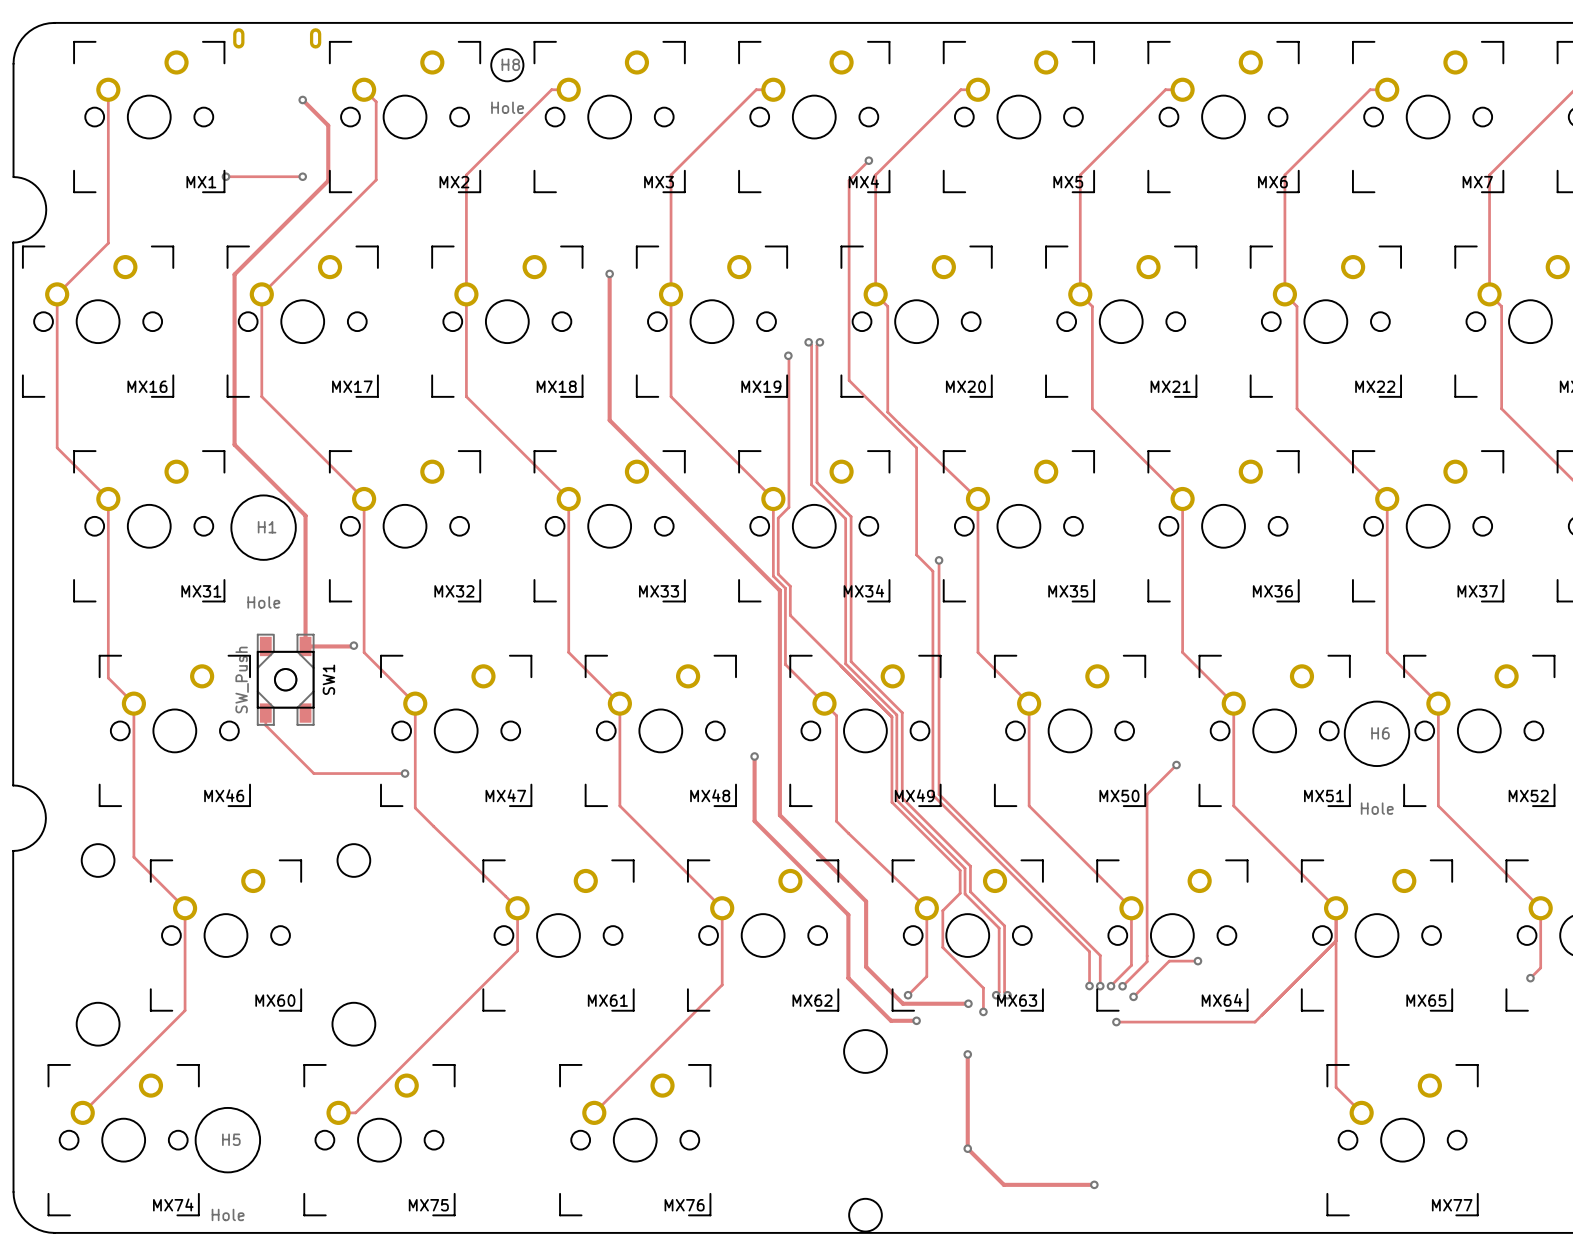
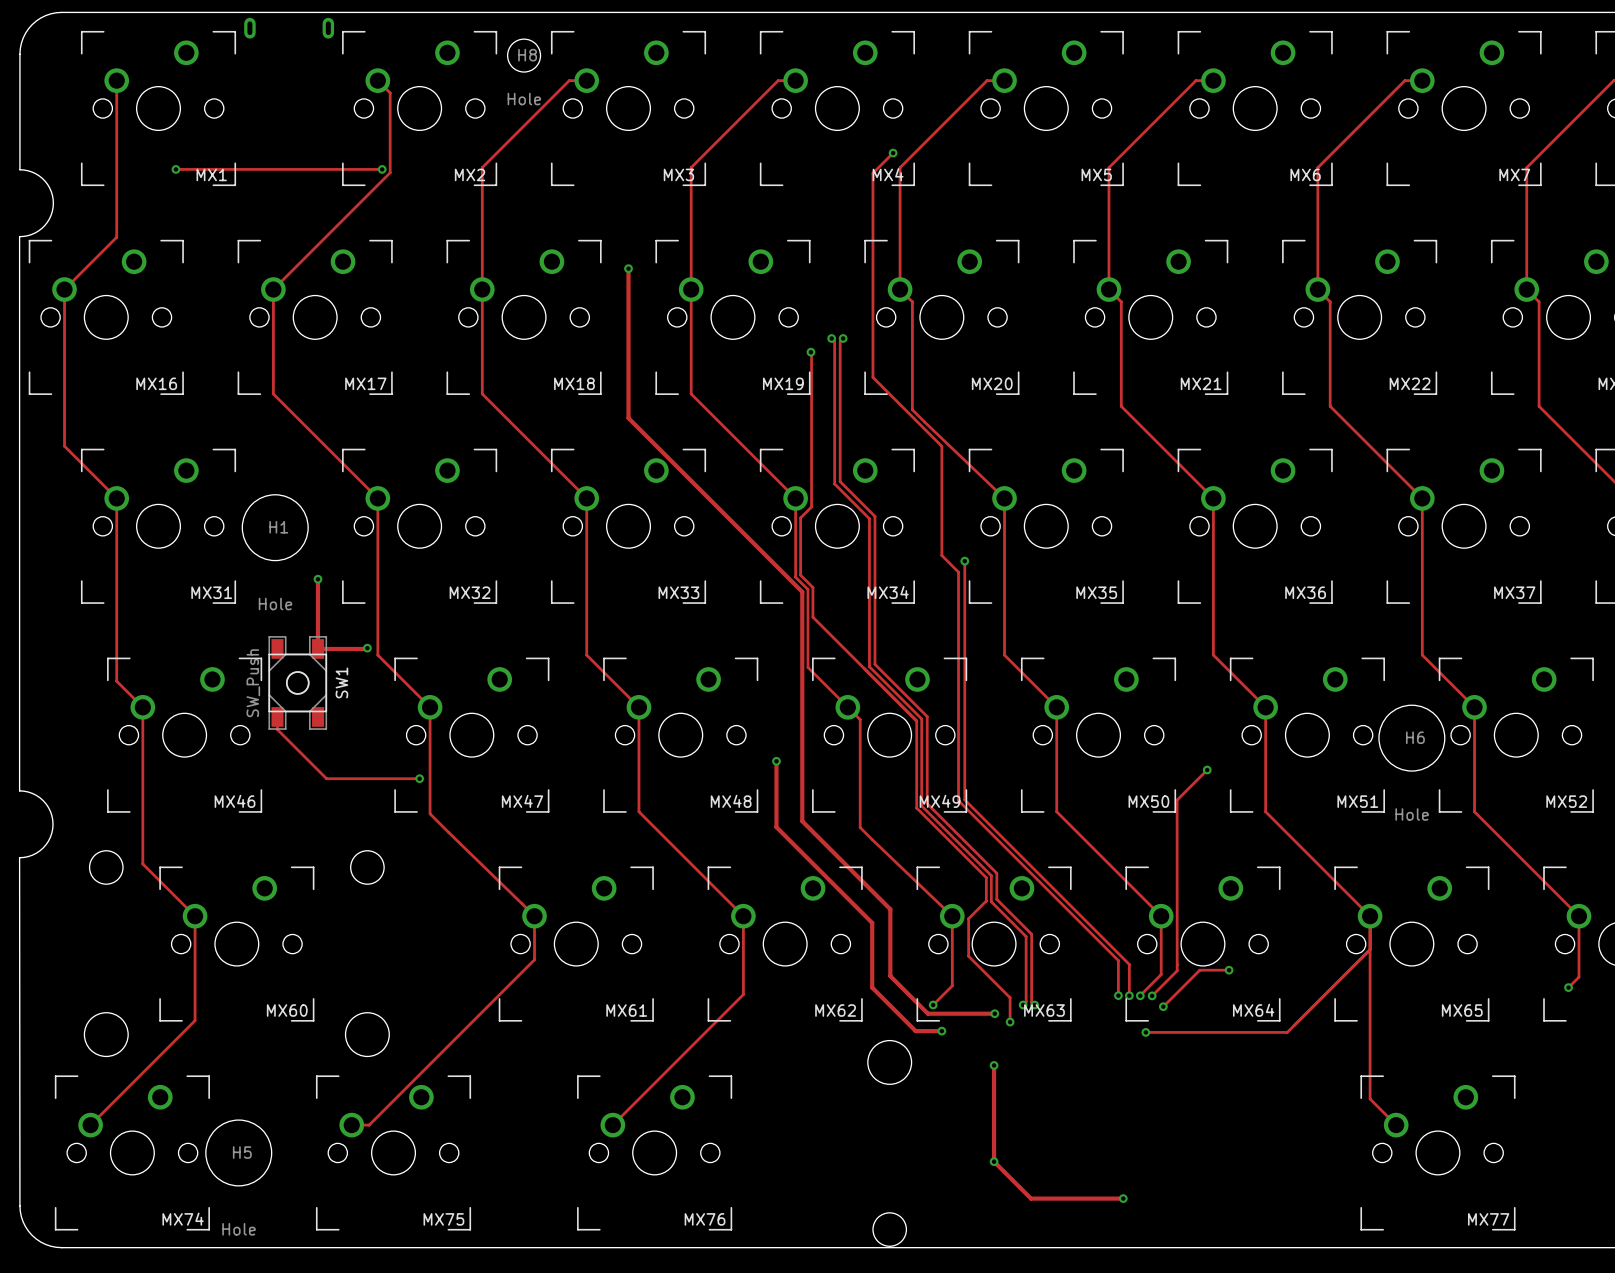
track: (302, 99) (328, 125) (328, 180) (234, 274) (234, 444) (305, 515) (305, 646) -> (317, 579) (317, 648)
via: (302, 99) -> none
track: none -> (175, 169) (236, 169)
via position: (225, 176) -> (175, 169)
track: none -> (315, 169) (382, 169)
via: (302, 176) -> none
via: none -> (382, 169)
via: none -> (317, 579)

